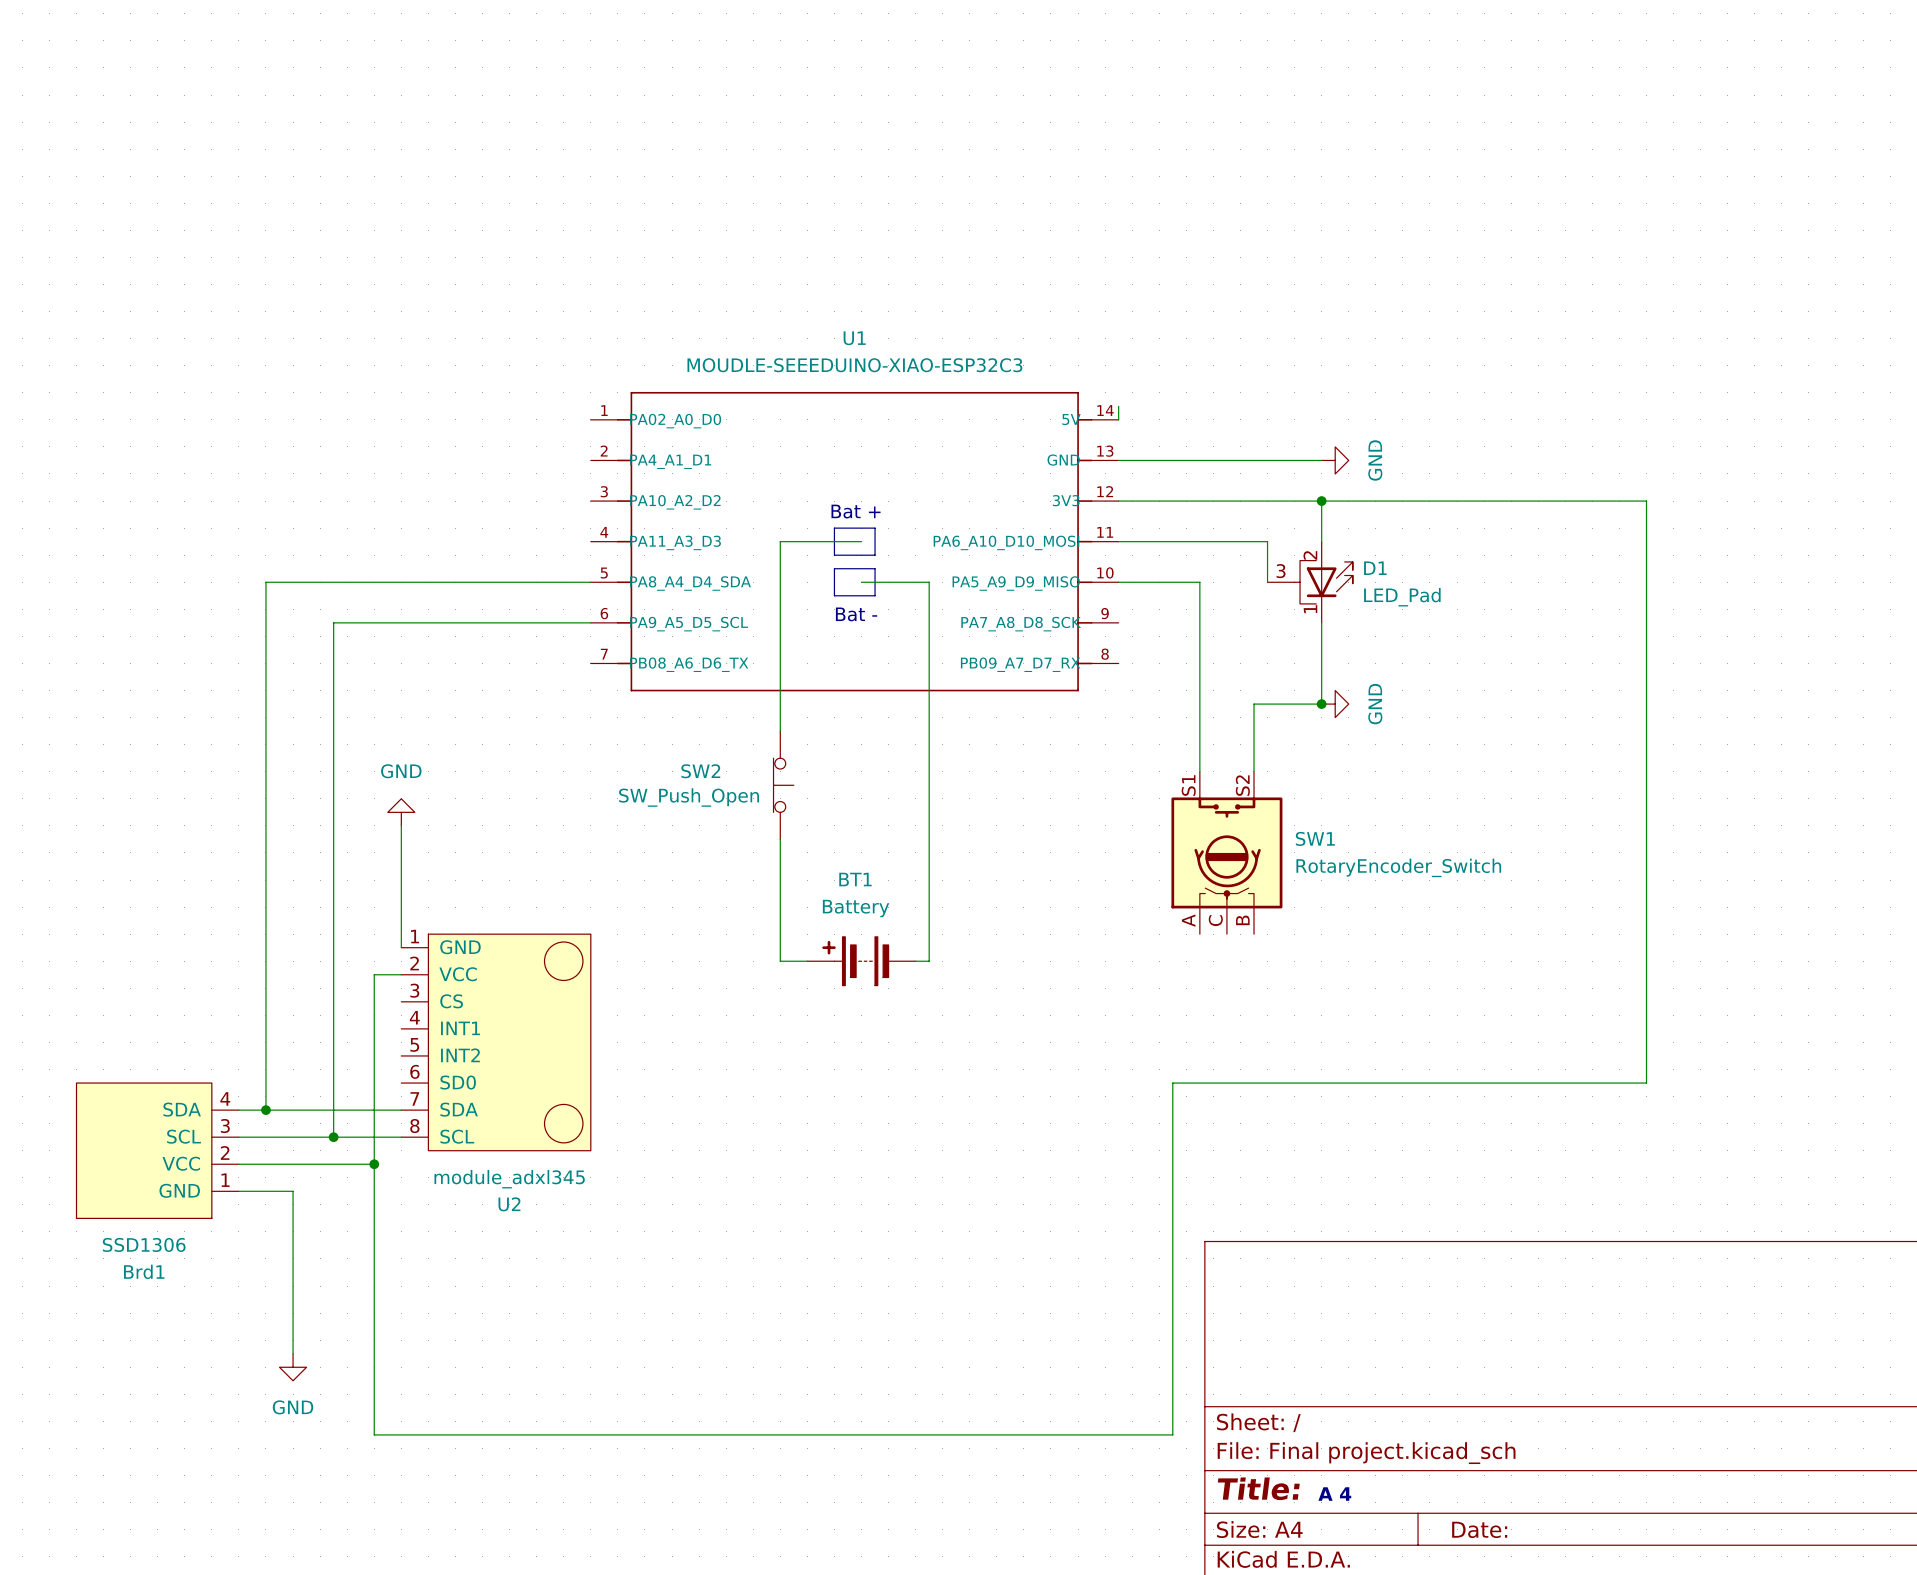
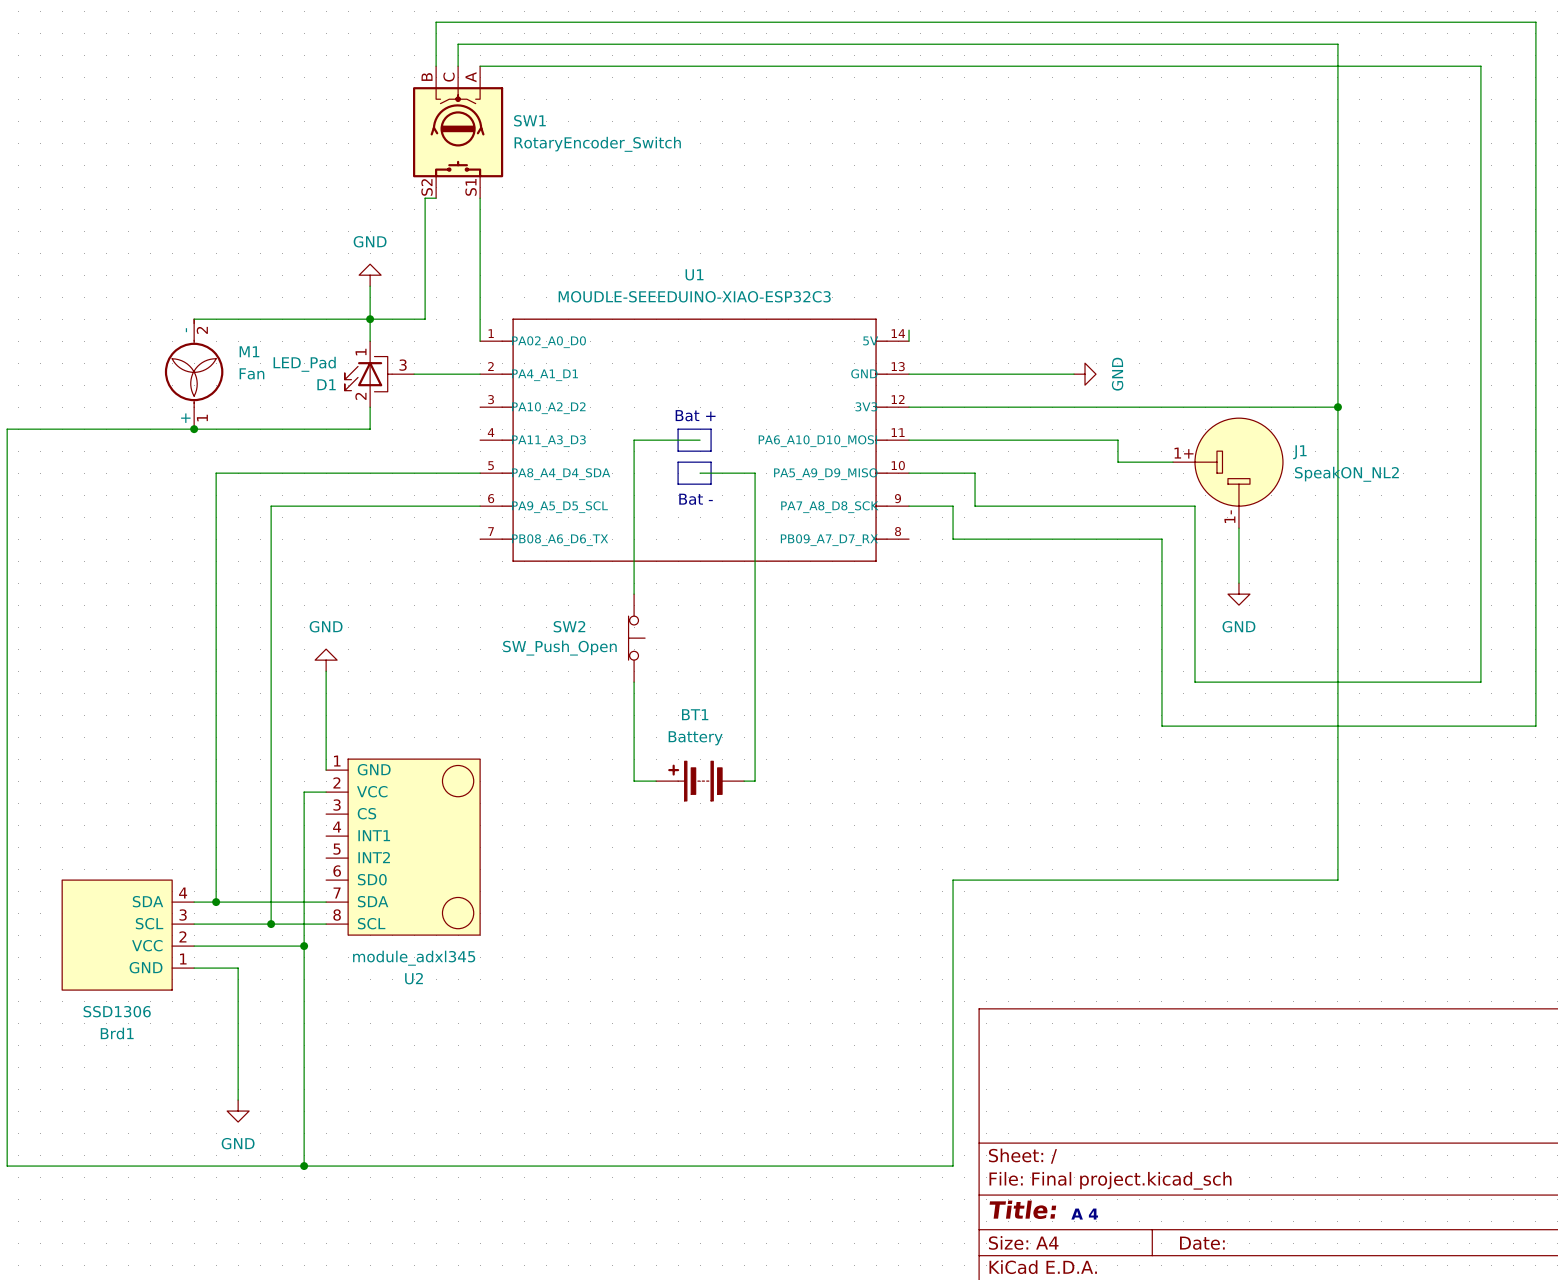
wire: none -> (436, 66) (436, 22) (1535, 22) (1535, 726) (1161, 726) (1161, 539) (953, 539) (953, 506) (909, 506)
wire: none -> (458, 66) (458, 44) (1337, 44) (1337, 407)
wire: none -> (436, 198) (425, 198) (425, 319) (194, 319)
wire: none -> (480, 198) (480, 341)
power symbol: none -> GND (370, 275)
wire: none -> (370, 286) (370, 341)
junction: none -> (370, 319)
M1: none -> Fan (194, 374)
wire: none -> (414, 374) (480, 374)
wire: none -> (370, 407) (370, 429) (7, 429) (7, 1166) (304, 1166)
wire: (1321, 501) (1321, 541) -> none
junction: (1321, 501) -> none
junction: none -> (1337, 407)
junction: none -> (194, 429)
wire: (1267, 541) (1267, 582) -> (1030, 440) (1117, 440) (1117, 462) (1172, 462)
D1 position: (1310, 582) -> (379, 374)
D1 rotation: 0° (1323, 582) -> 180° (368, 374)
J1: none -> SpeakON_NL2 (1227, 473)
wire: (1199, 622) (1199, 771) -> (975, 506) (1194, 506) (1194, 682) (1480, 682) (1480, 66) (480, 66)
wire: (1321, 622) (1321, 704) (1254, 704) (1254, 771) -> none
wire: none -> (1238, 528) (1238, 583)
junction: (1321, 704) -> none
power symbol rotation: 0° (1335, 704) -> 90° clockwise (1238, 594)
power symbol position: GND (1335, 704) -> GND (1238, 594)
SW1 rotation: 0° (1226, 852) -> 180° (458, 132)
SW1 position: (1226, 852) -> (458, 132)
junction: none -> (304, 1166)

